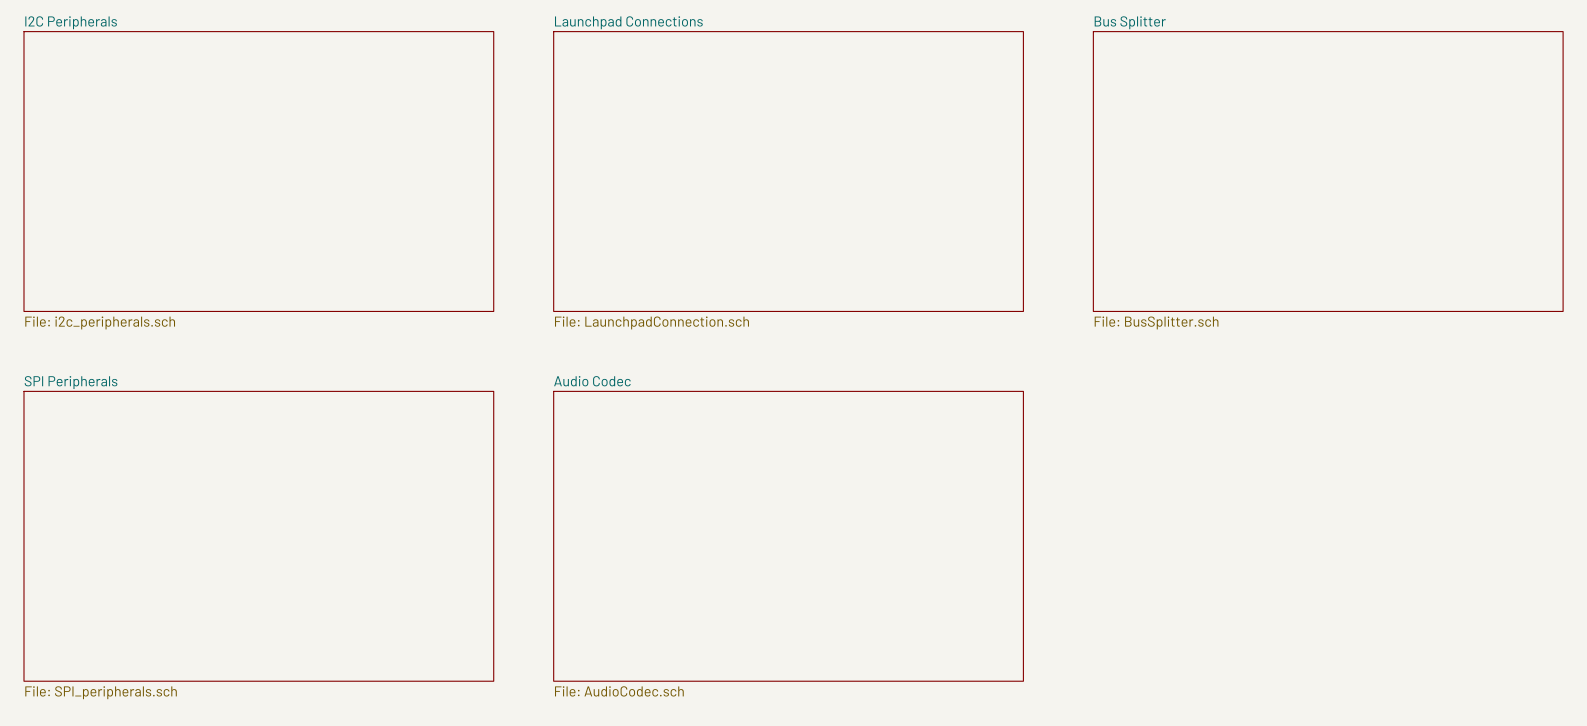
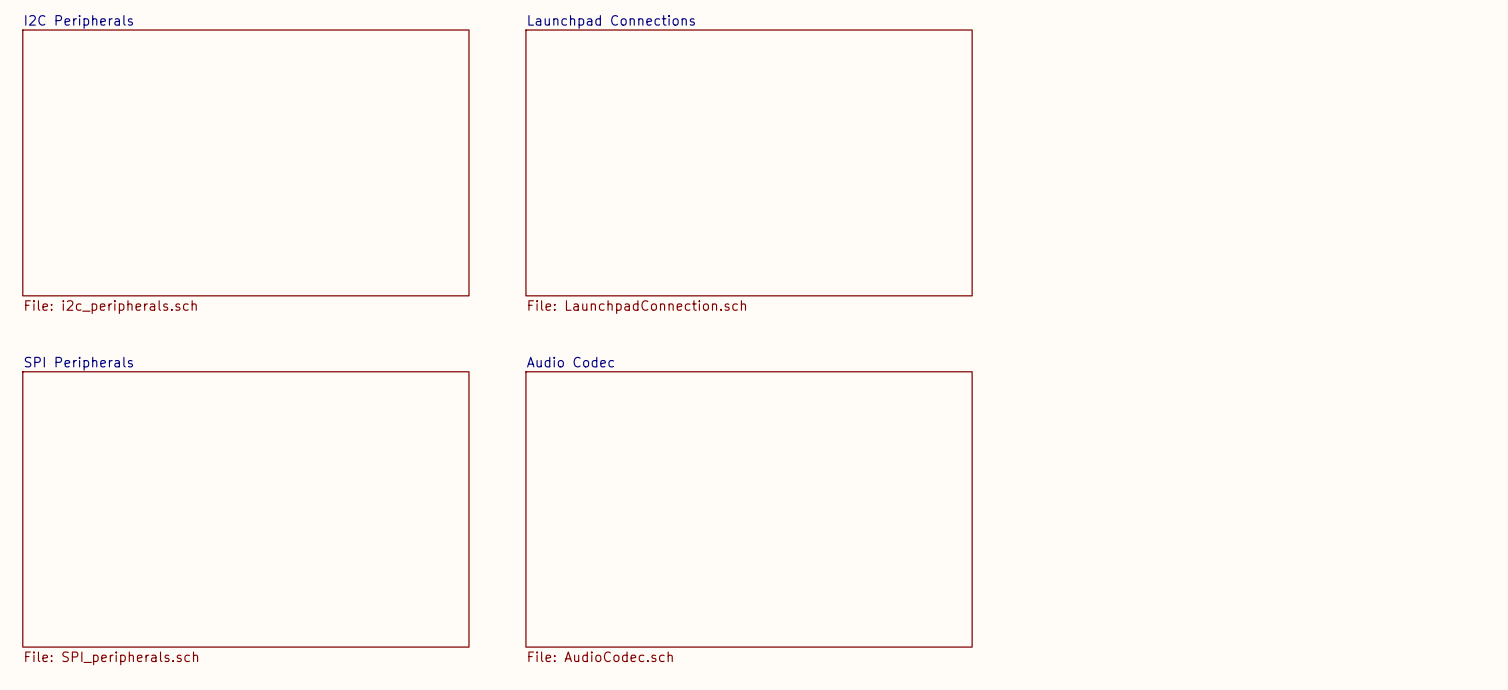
sheet Bus Splitter: File: BusSplitter.sch (1328, 171) -> none

